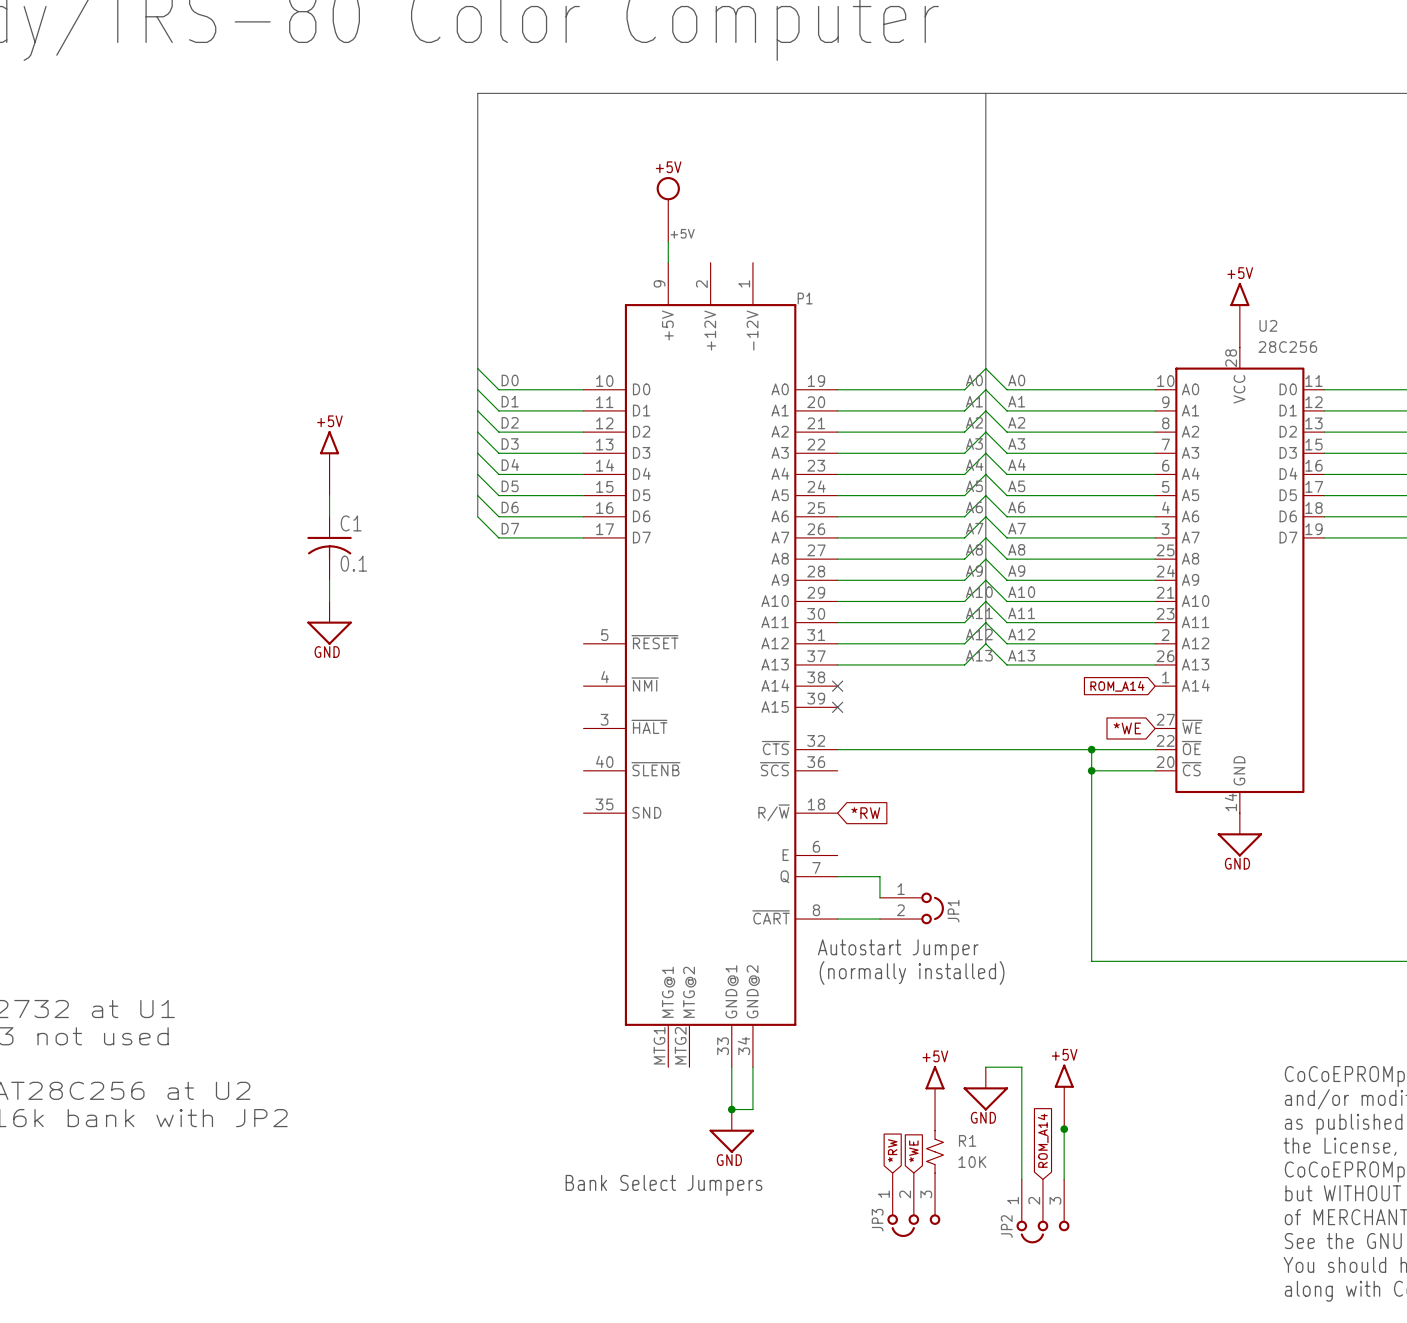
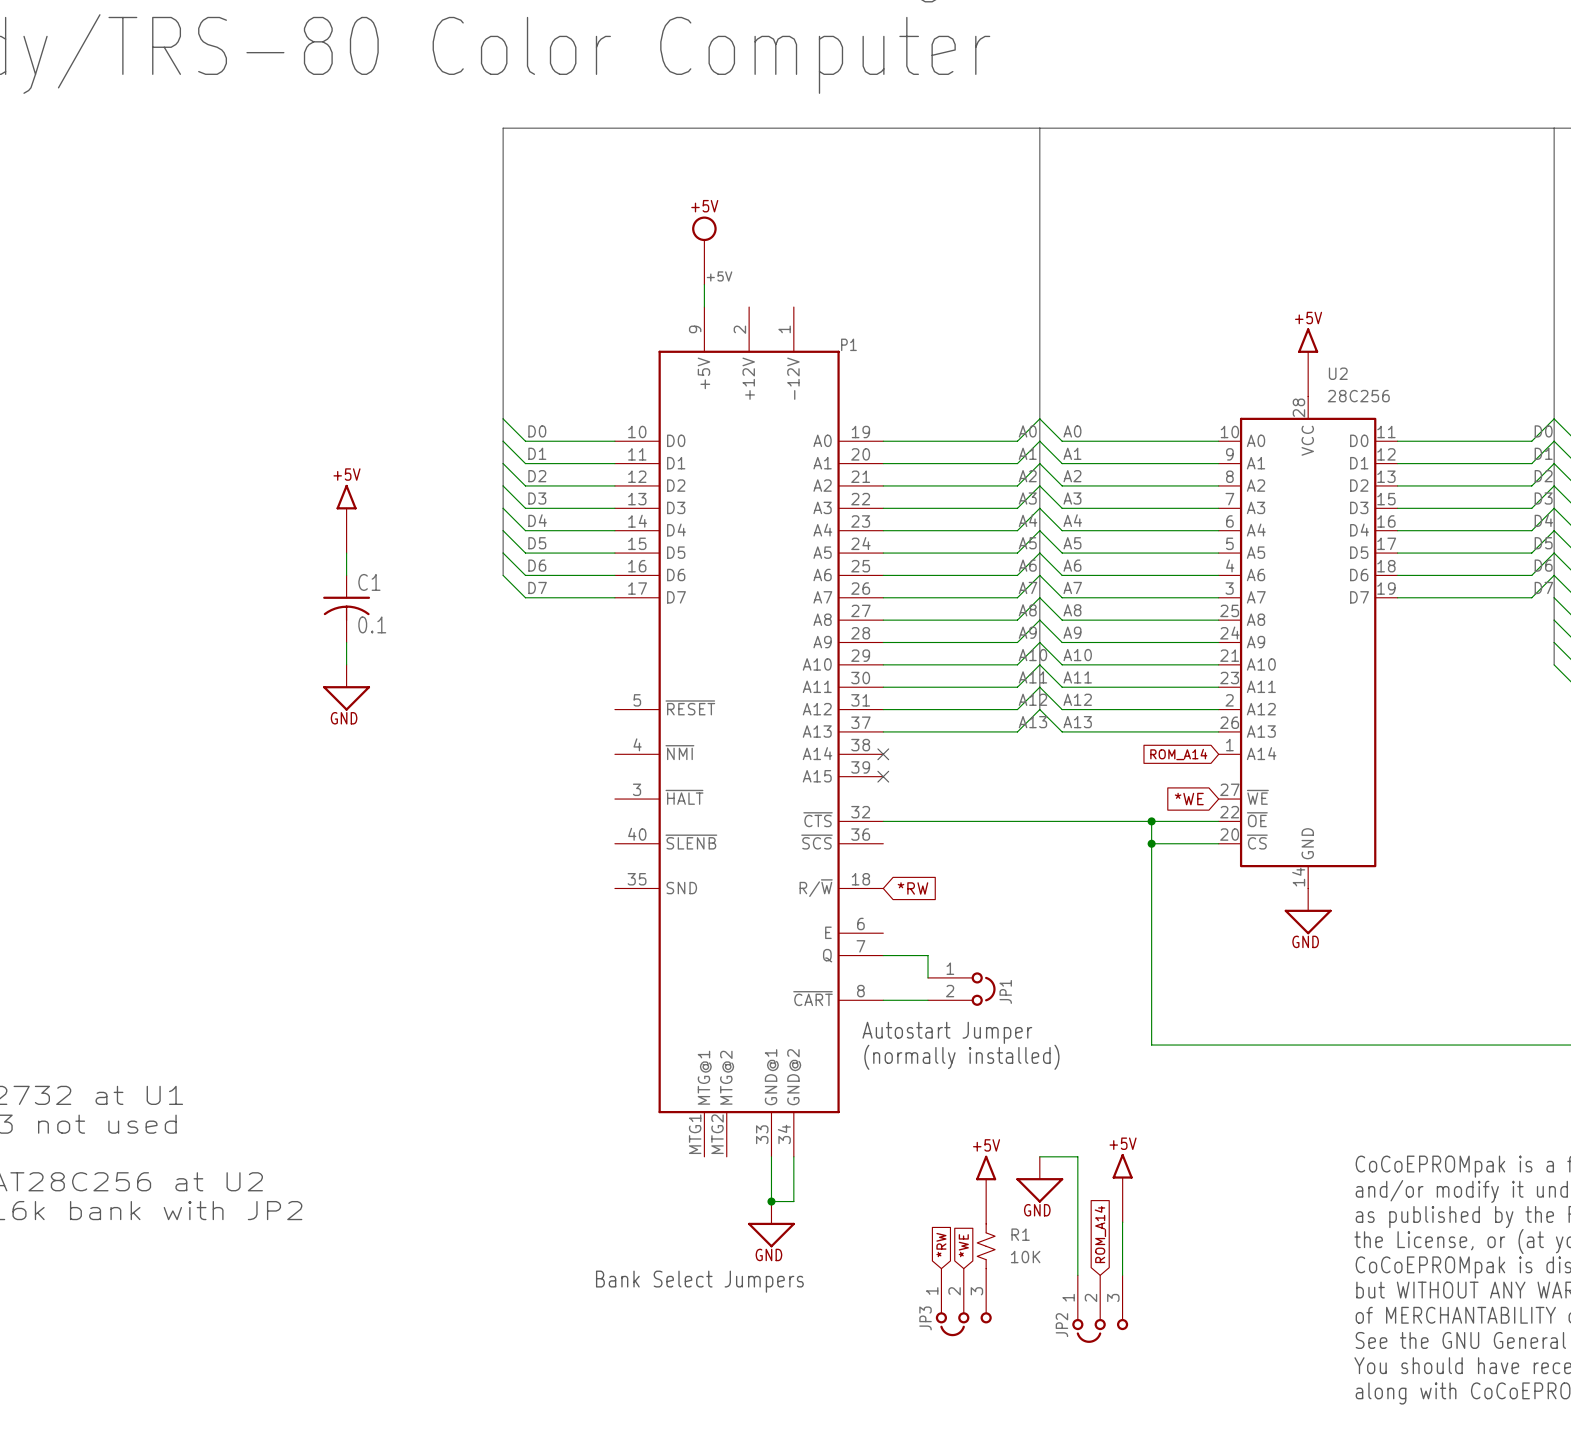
junction: (1064, 1129) -> none

